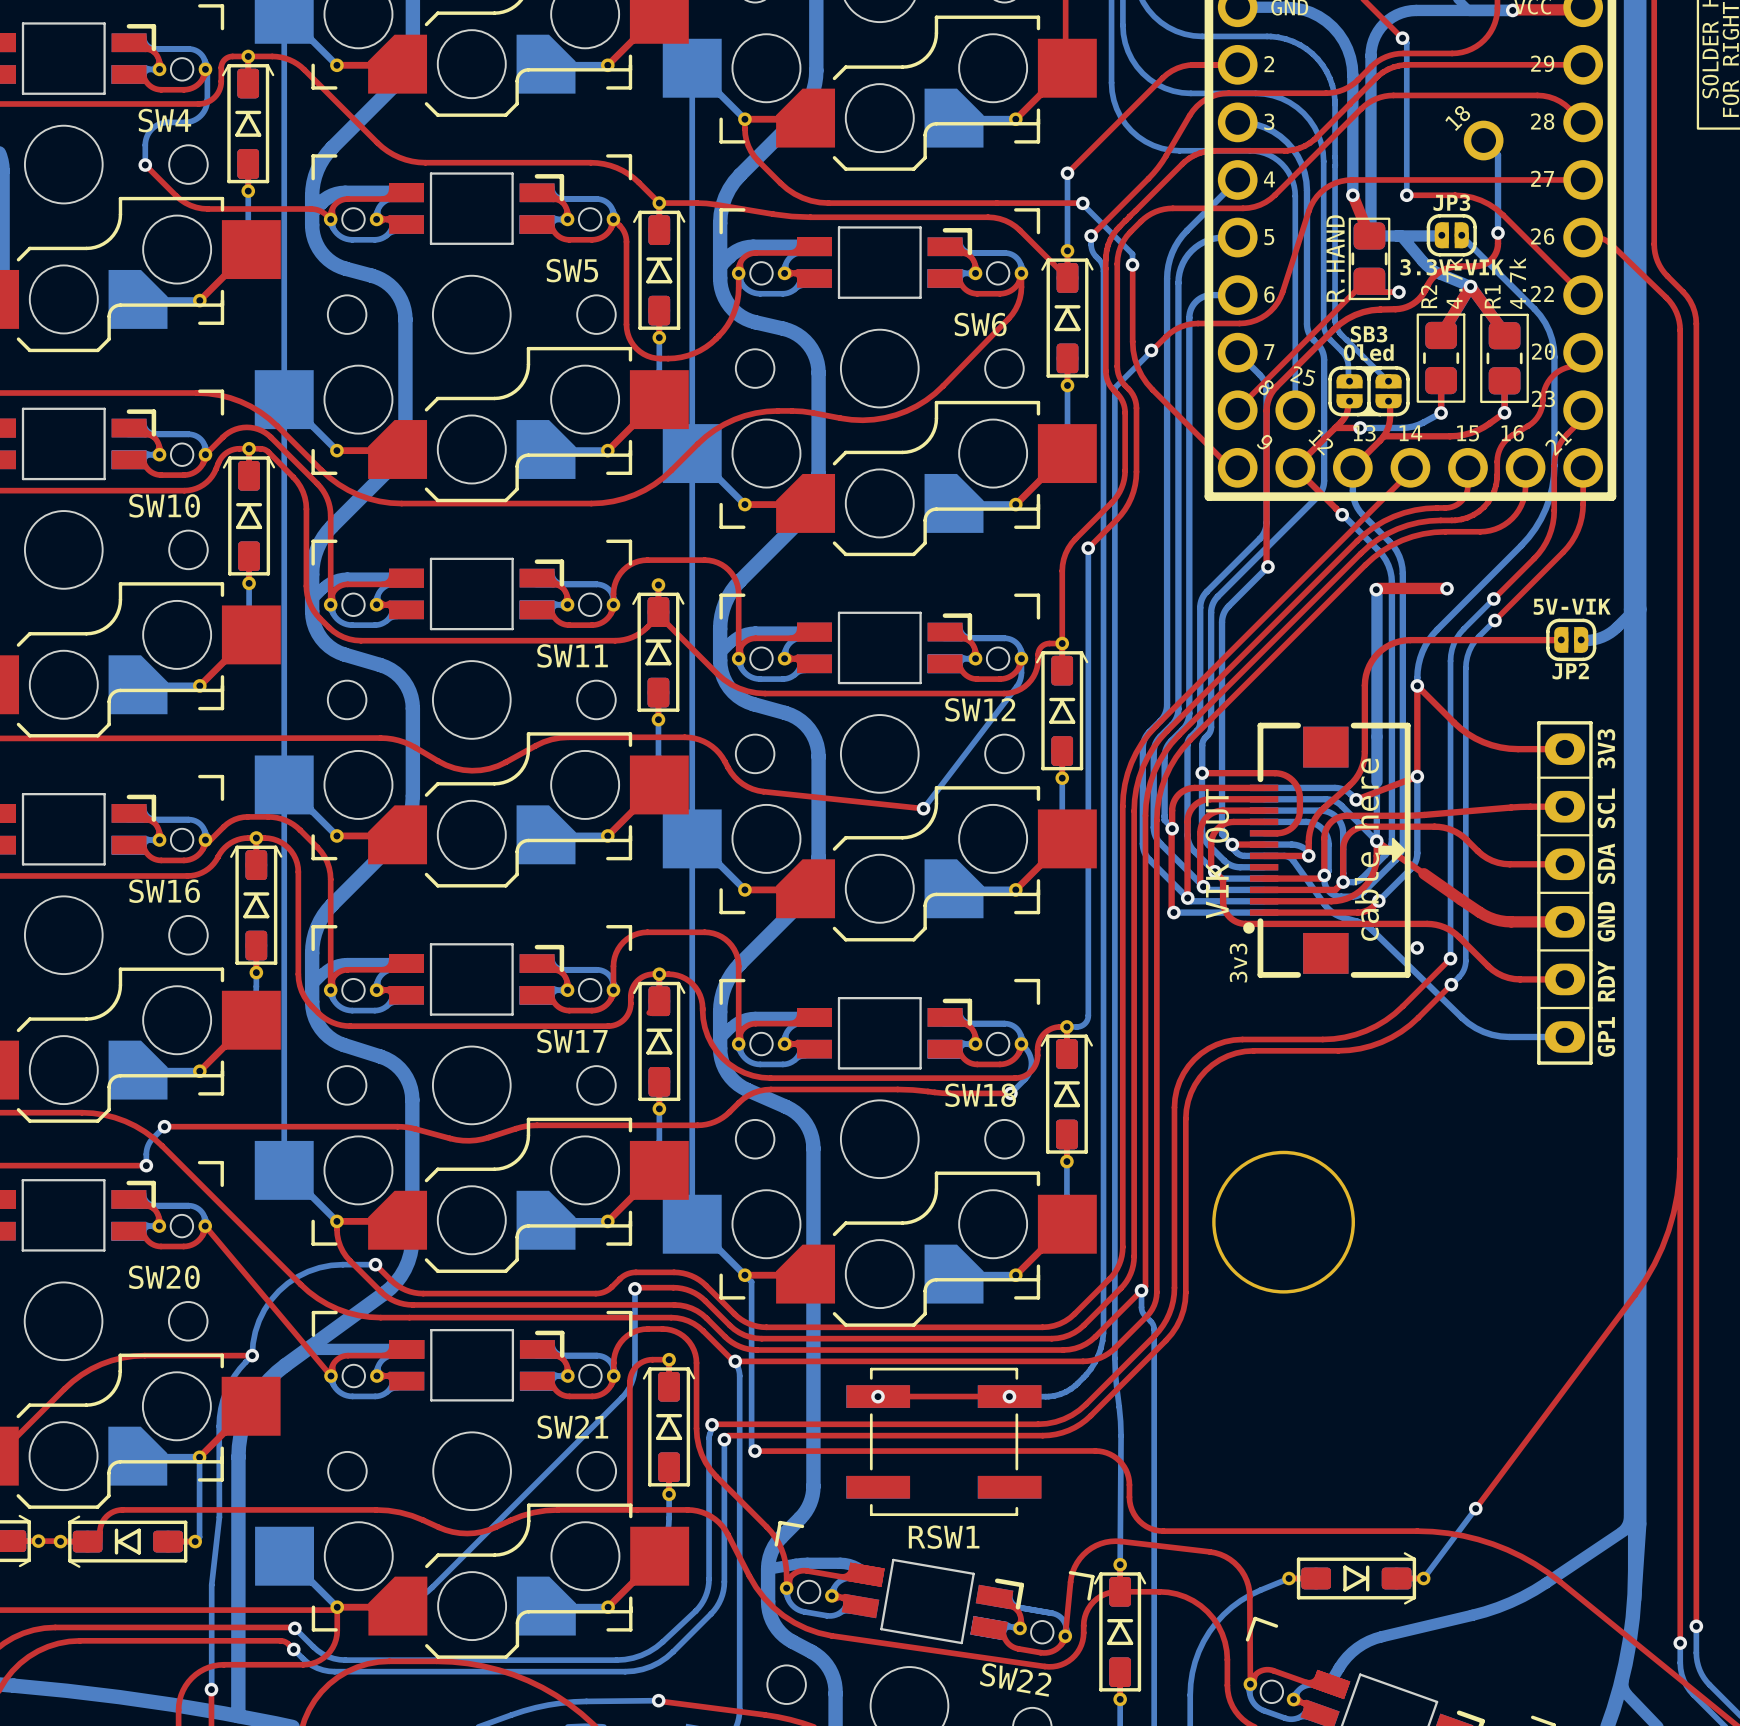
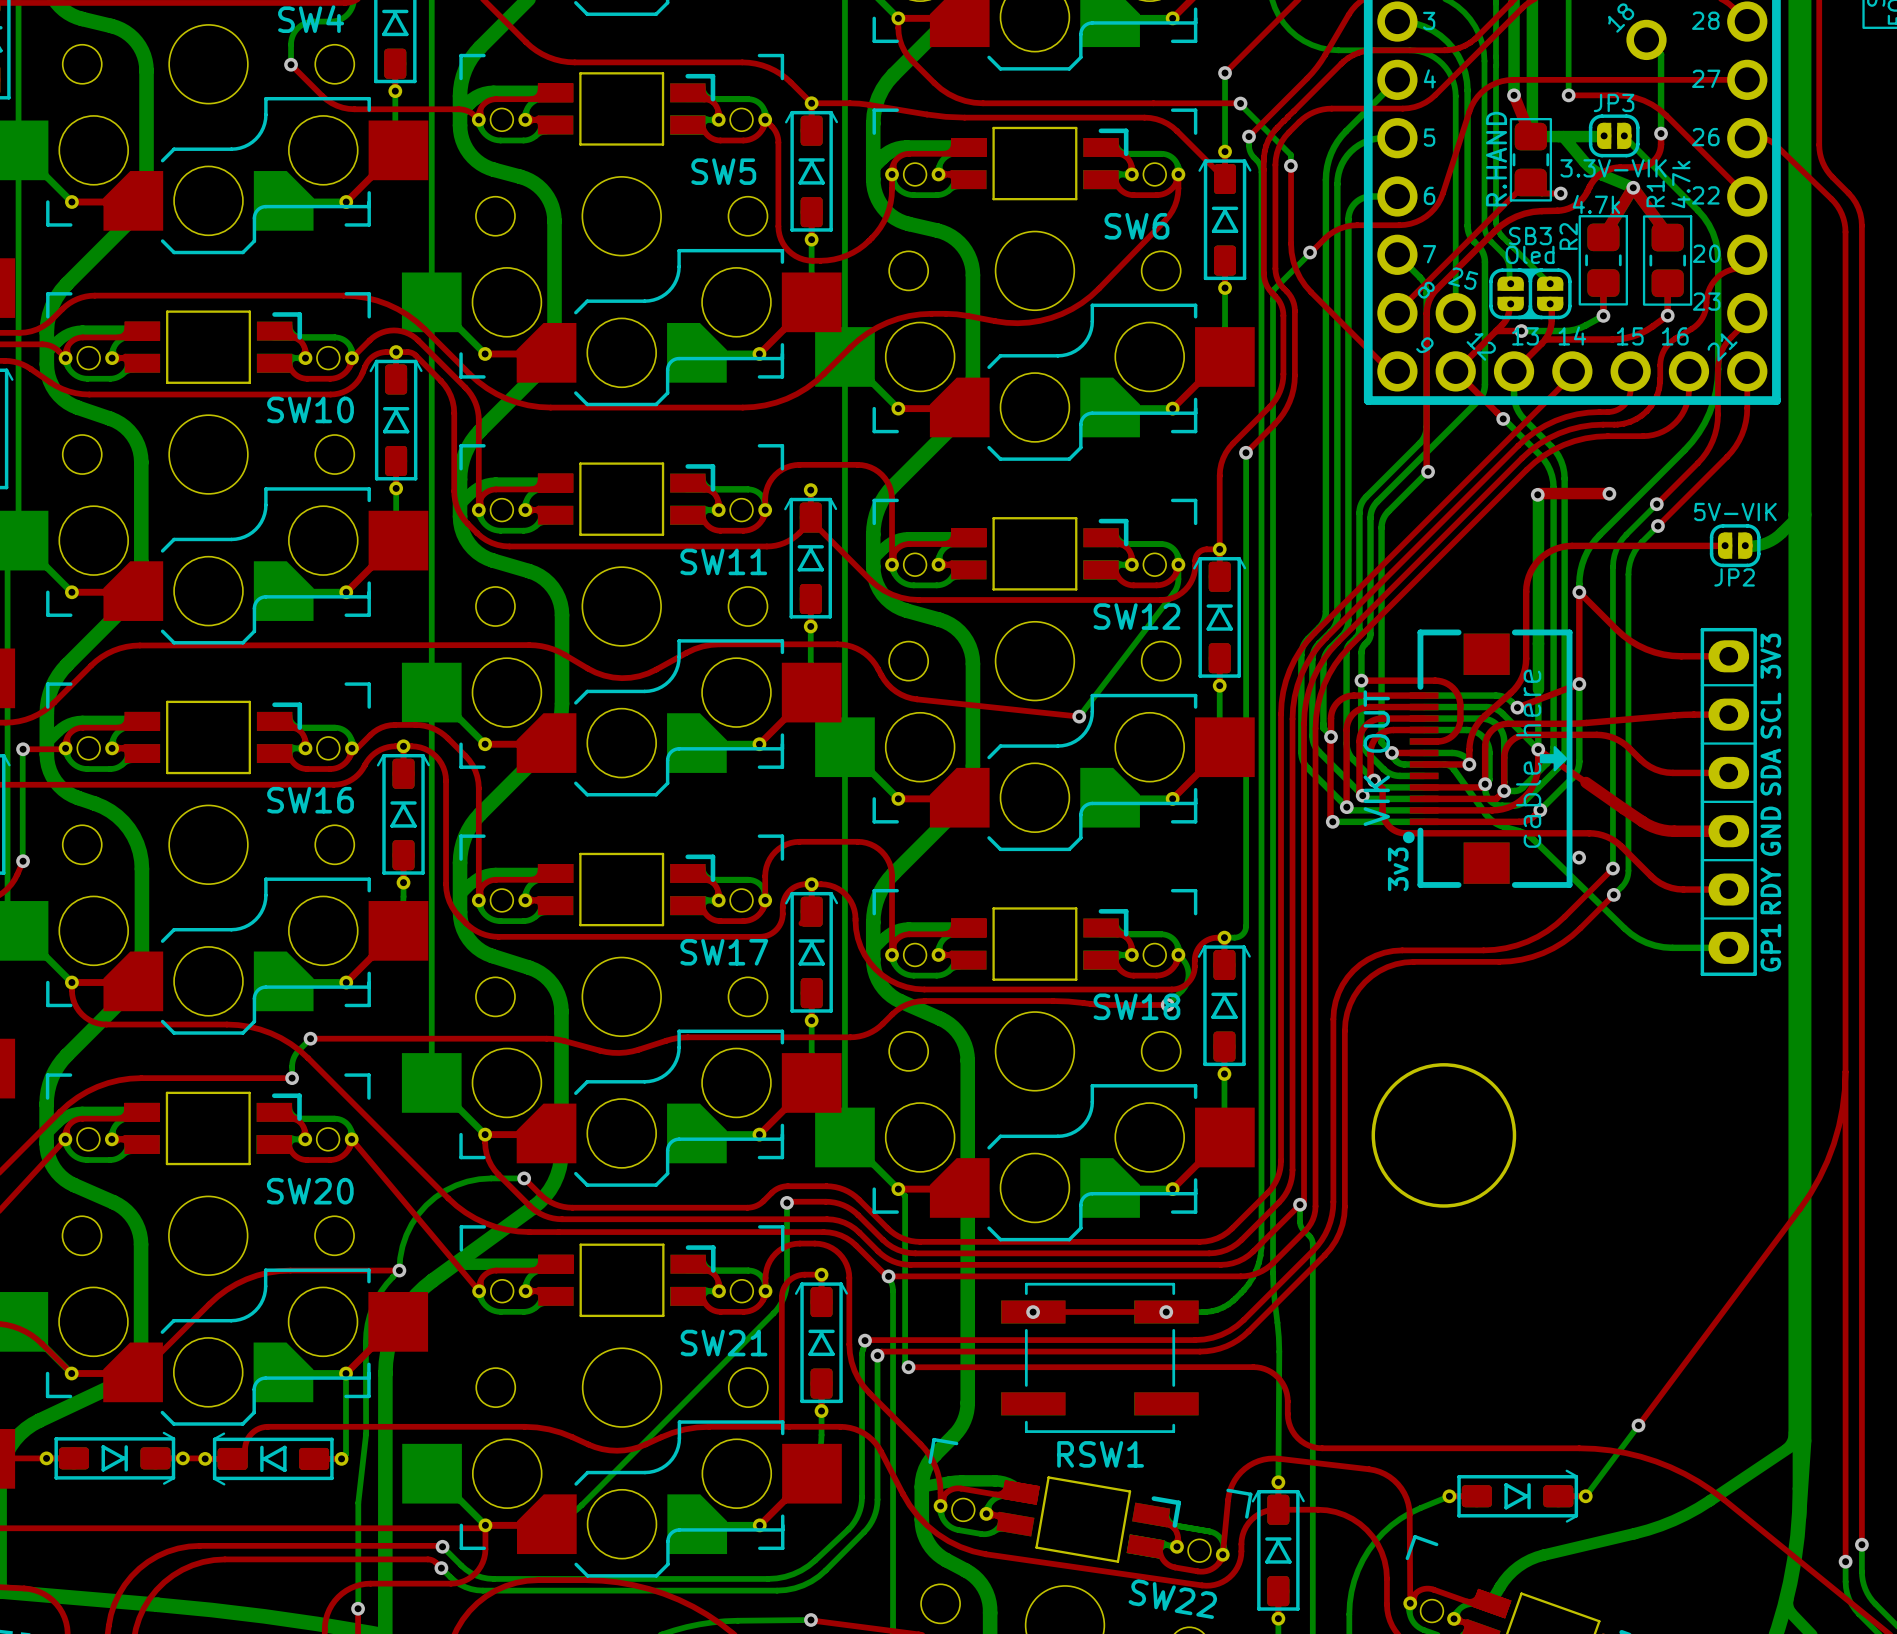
R2 value rotation: 0° (1454, 283) -> 90° clockwise (1596, 204)
R2 name position: R2 (1429, 296) -> R2 (1568, 236)

